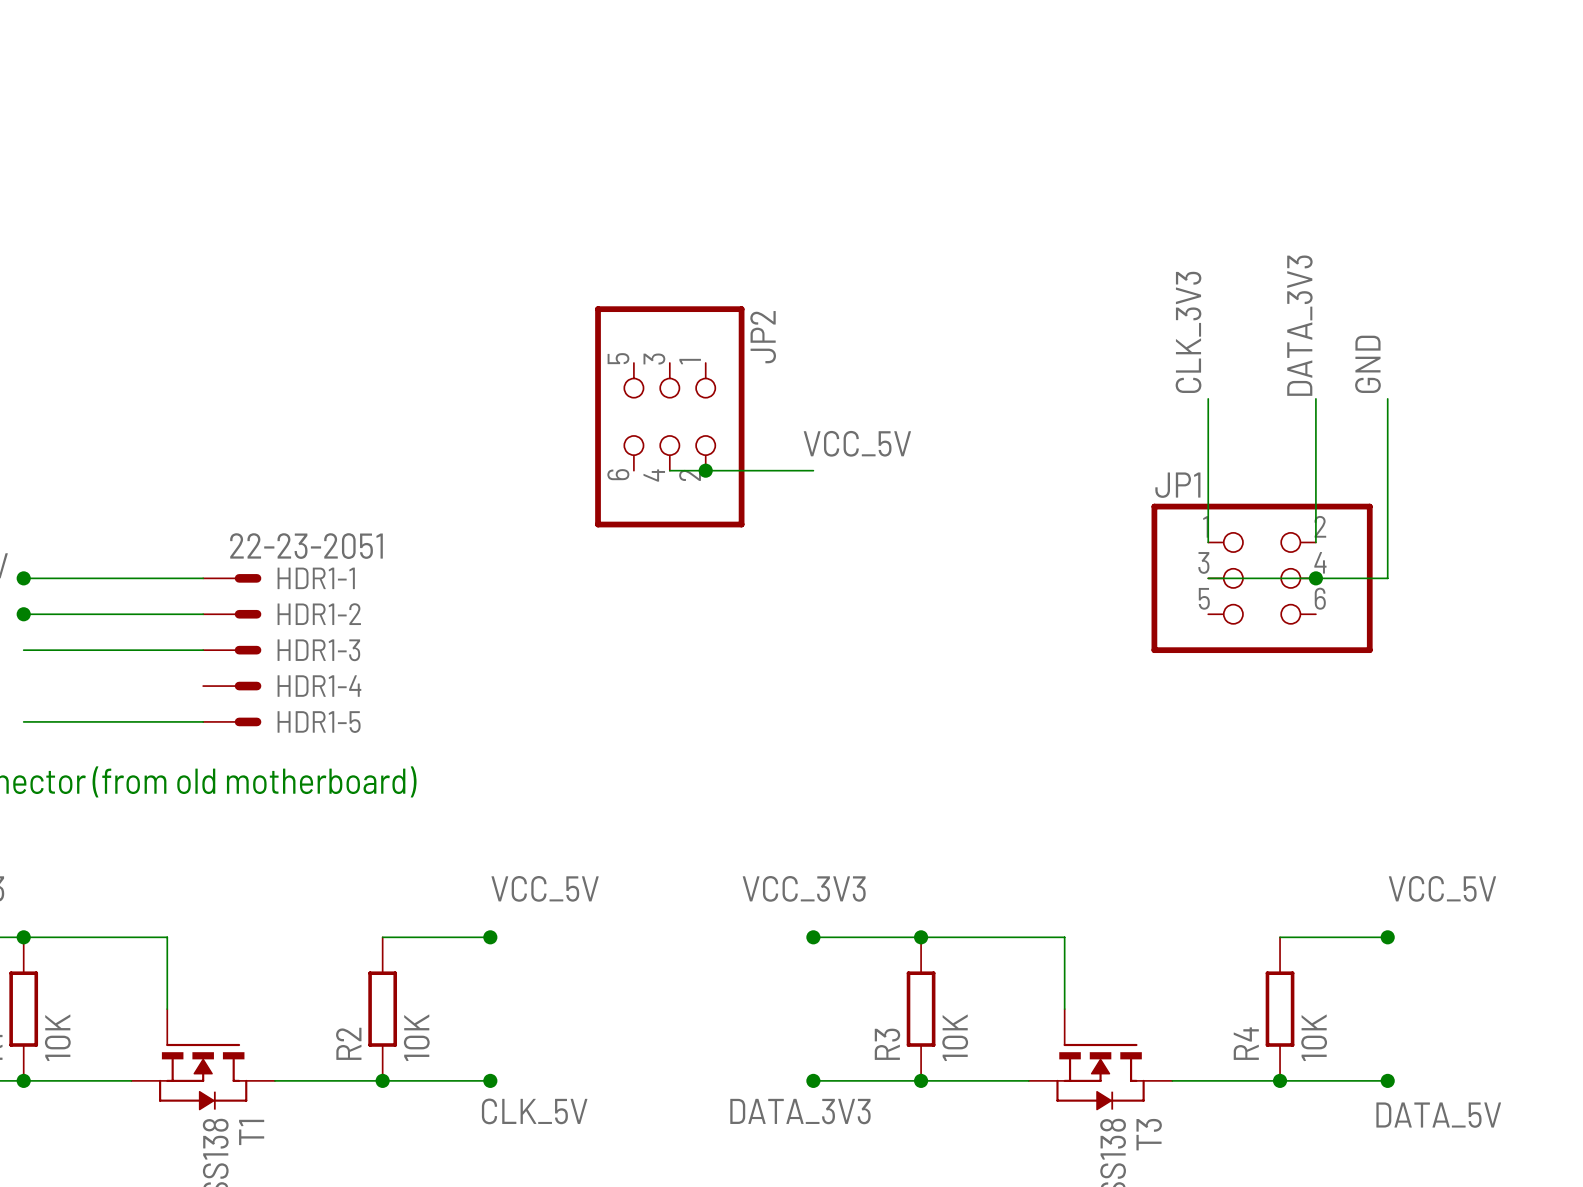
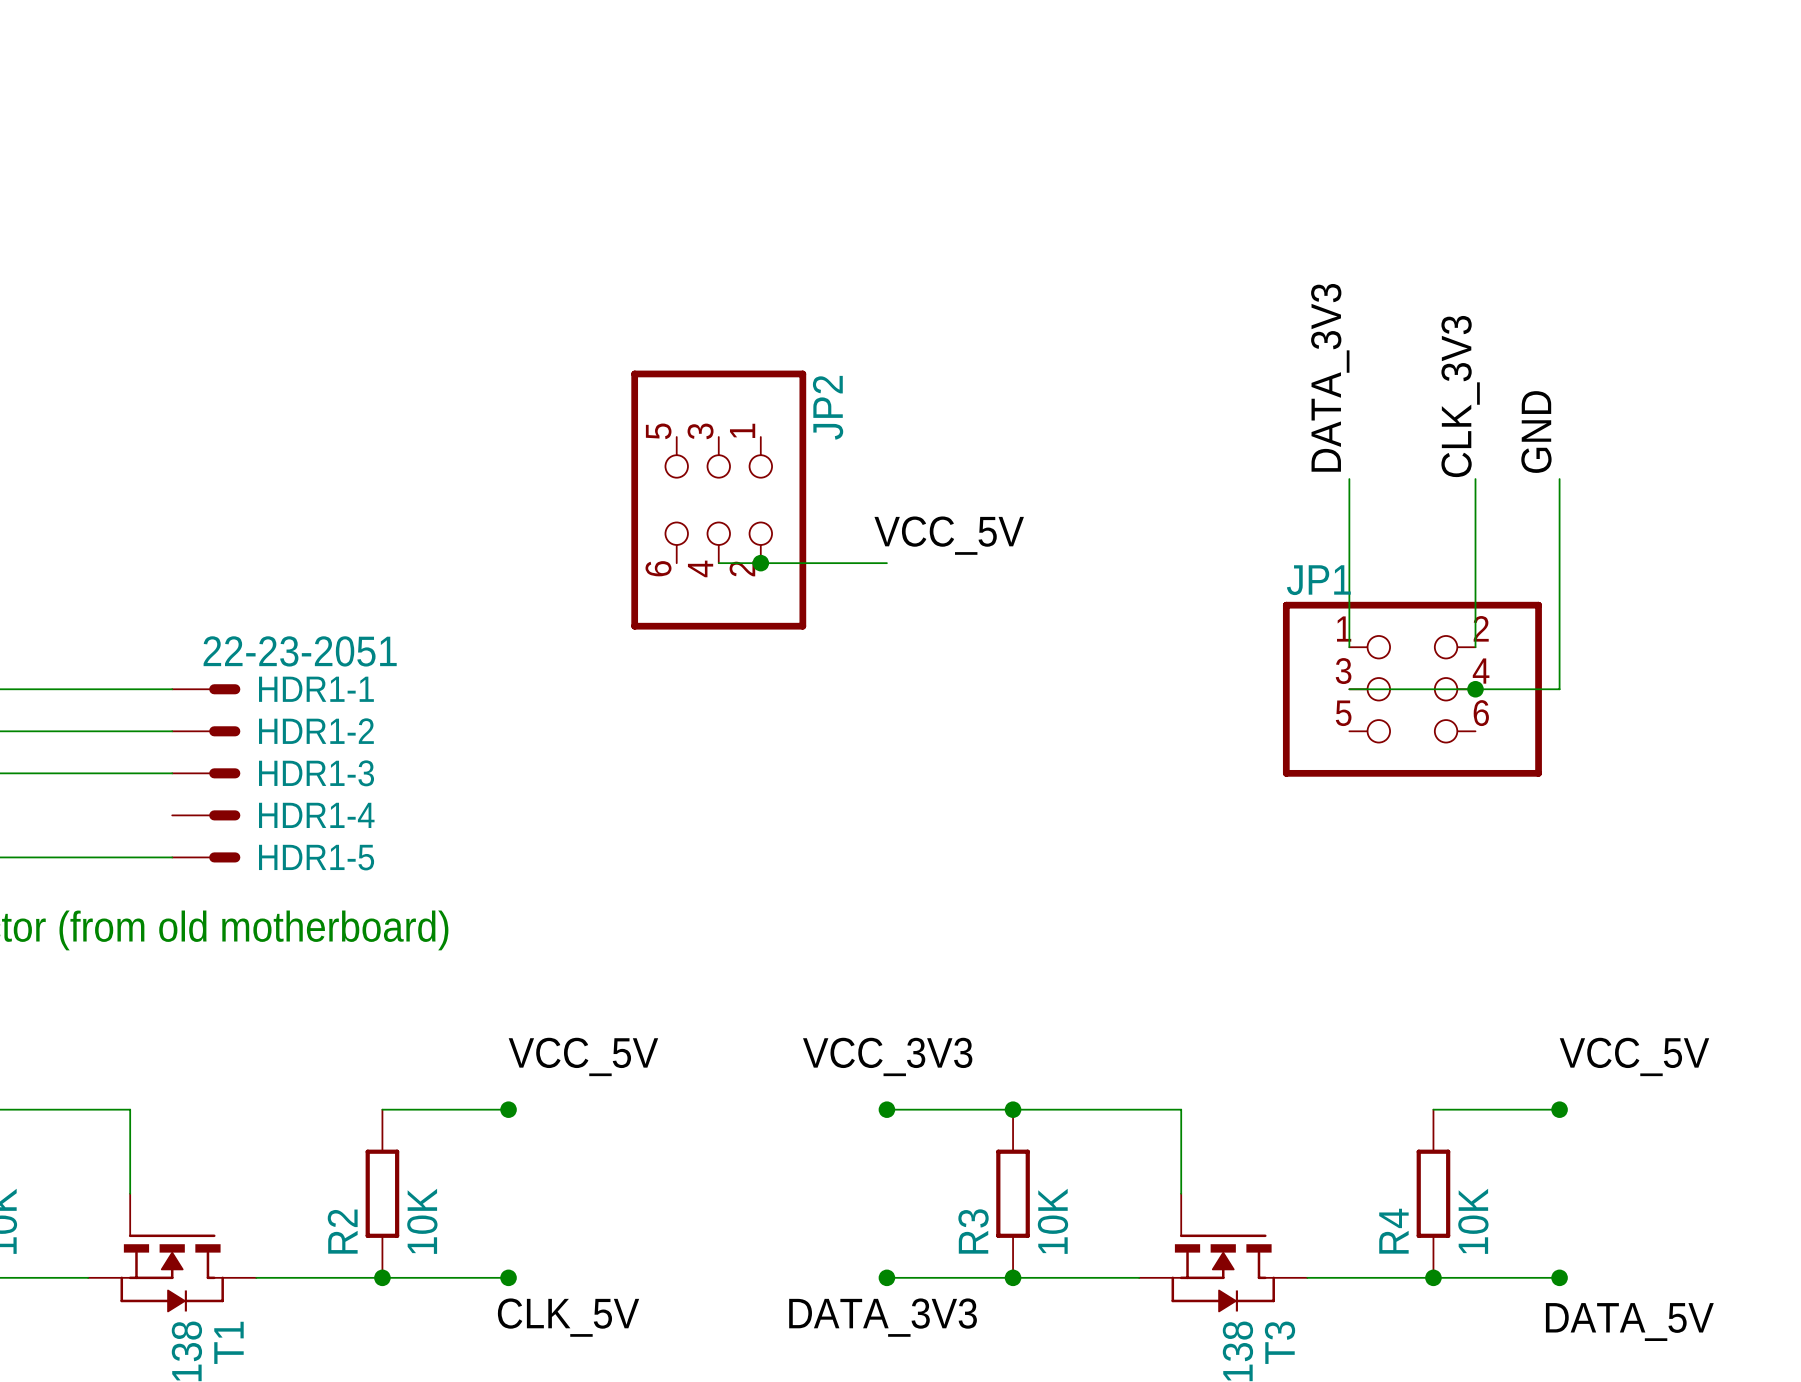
label: DATA_3V3 (1299, 325) -> CLK_3V3 (1460, 396)
label: CLK_3V3 (1188, 332) -> DATA_3V3 (1330, 377)

